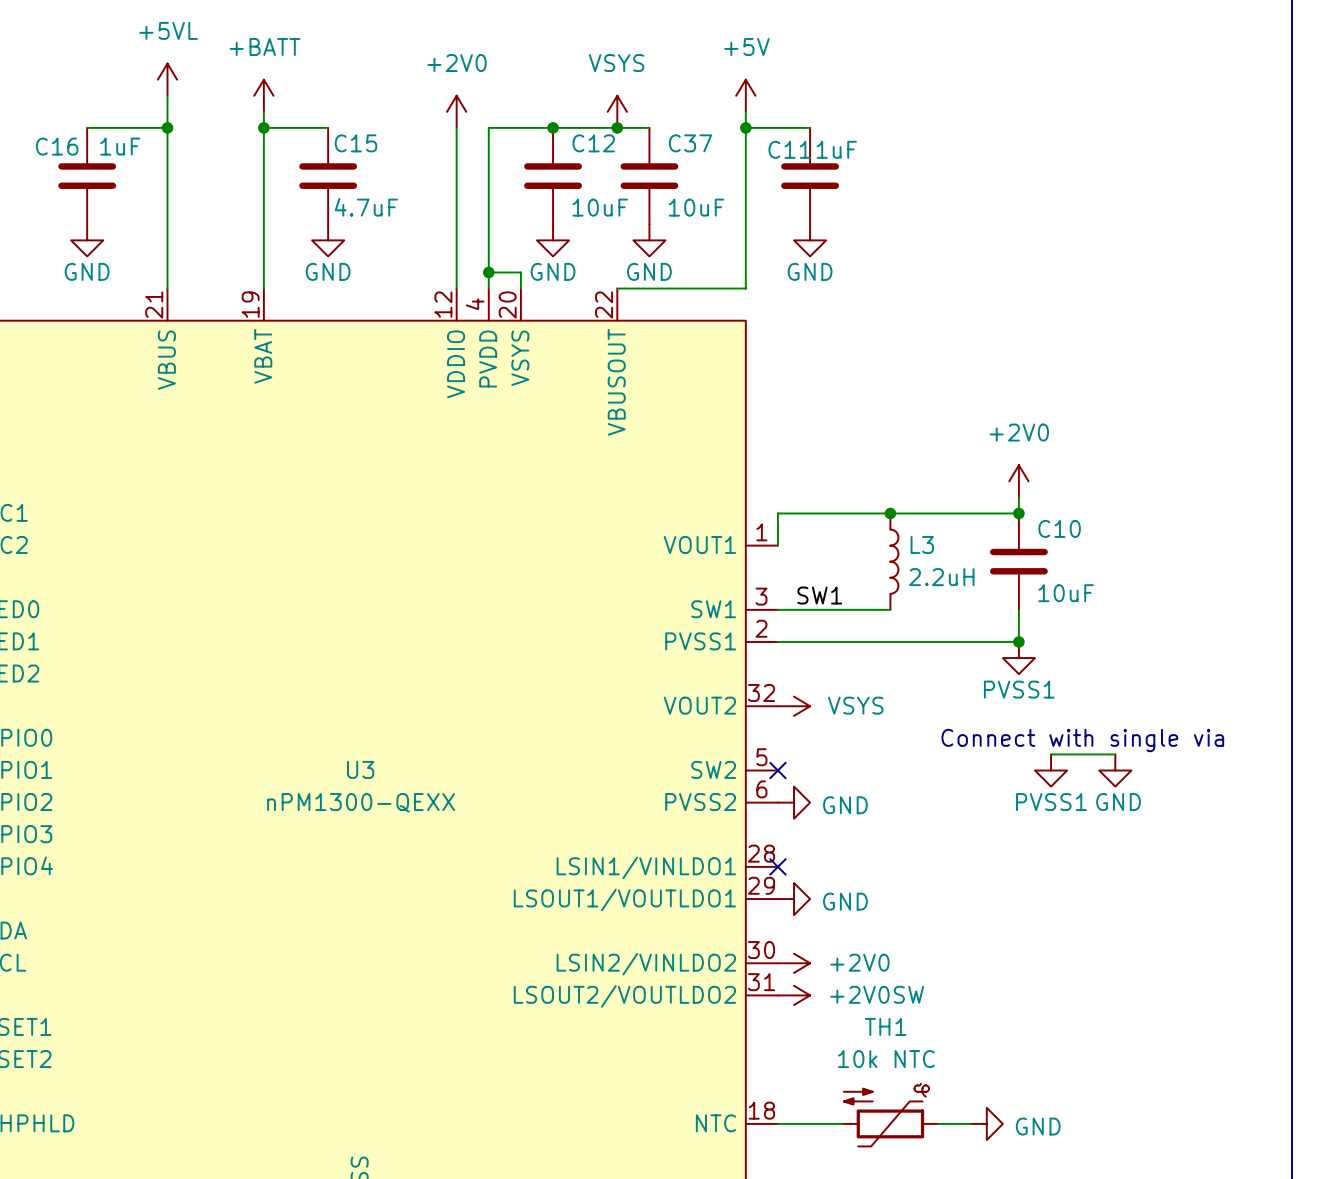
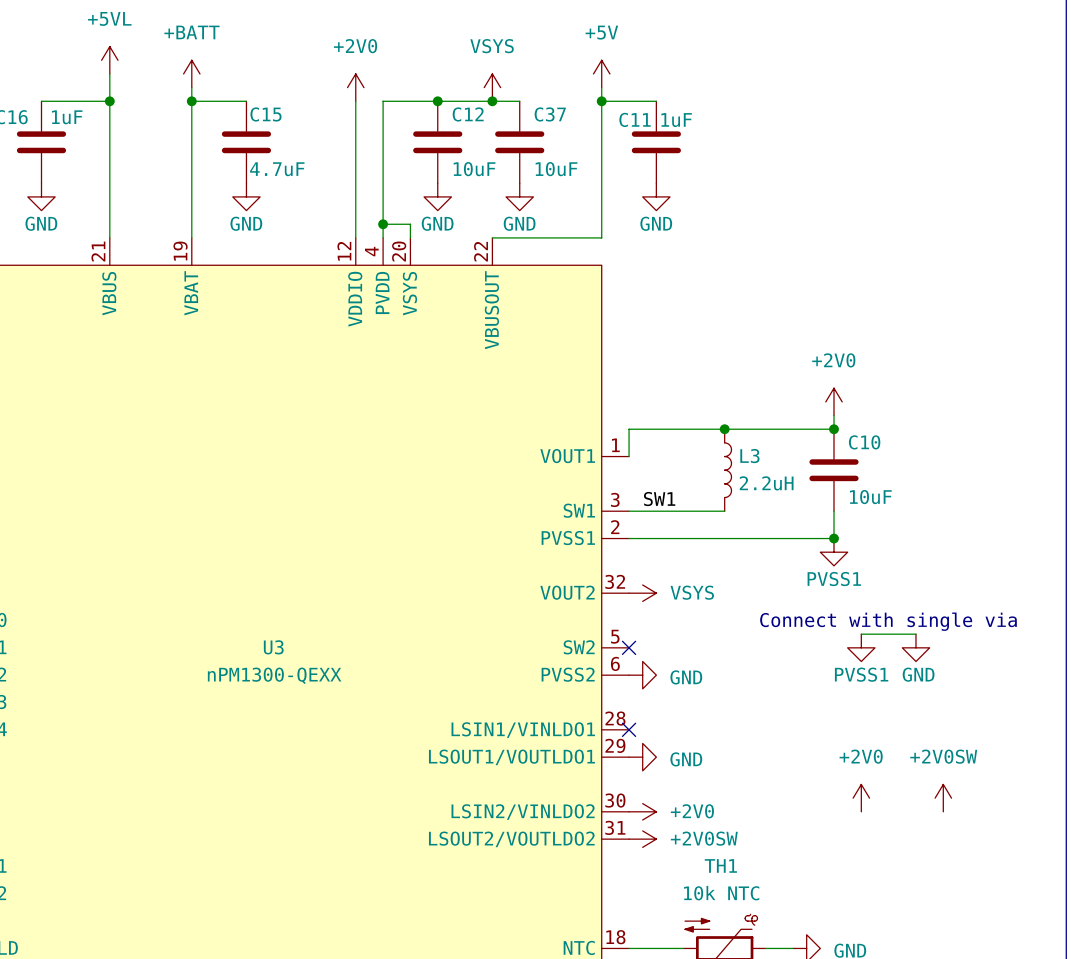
power symbol: none -> +2V0 (861, 798)
power symbol: none -> +2V0SW (943, 798)

